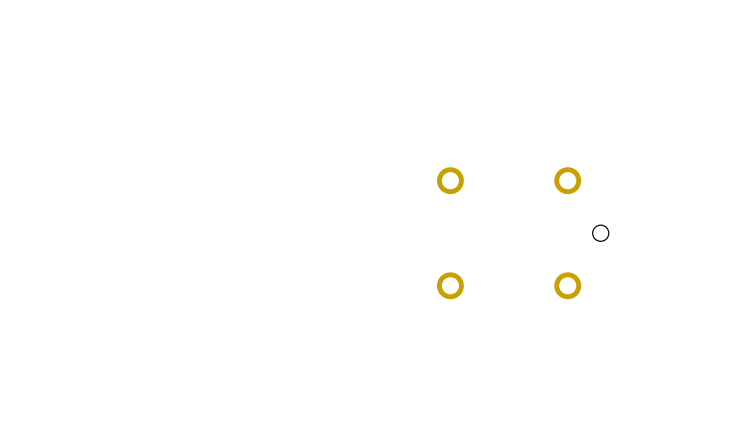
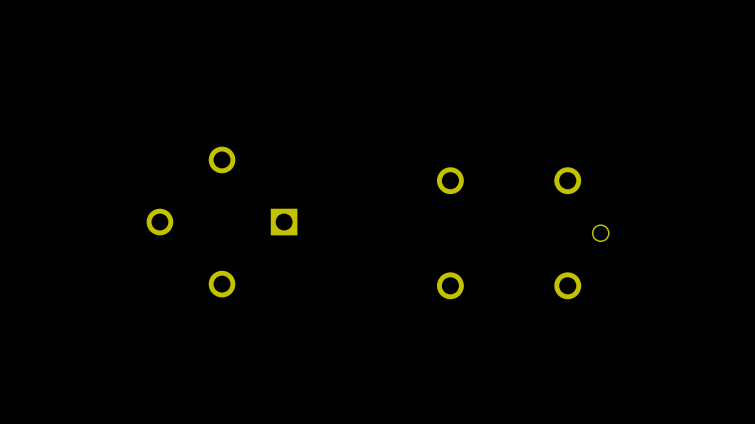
part: none -> (222, 222)

